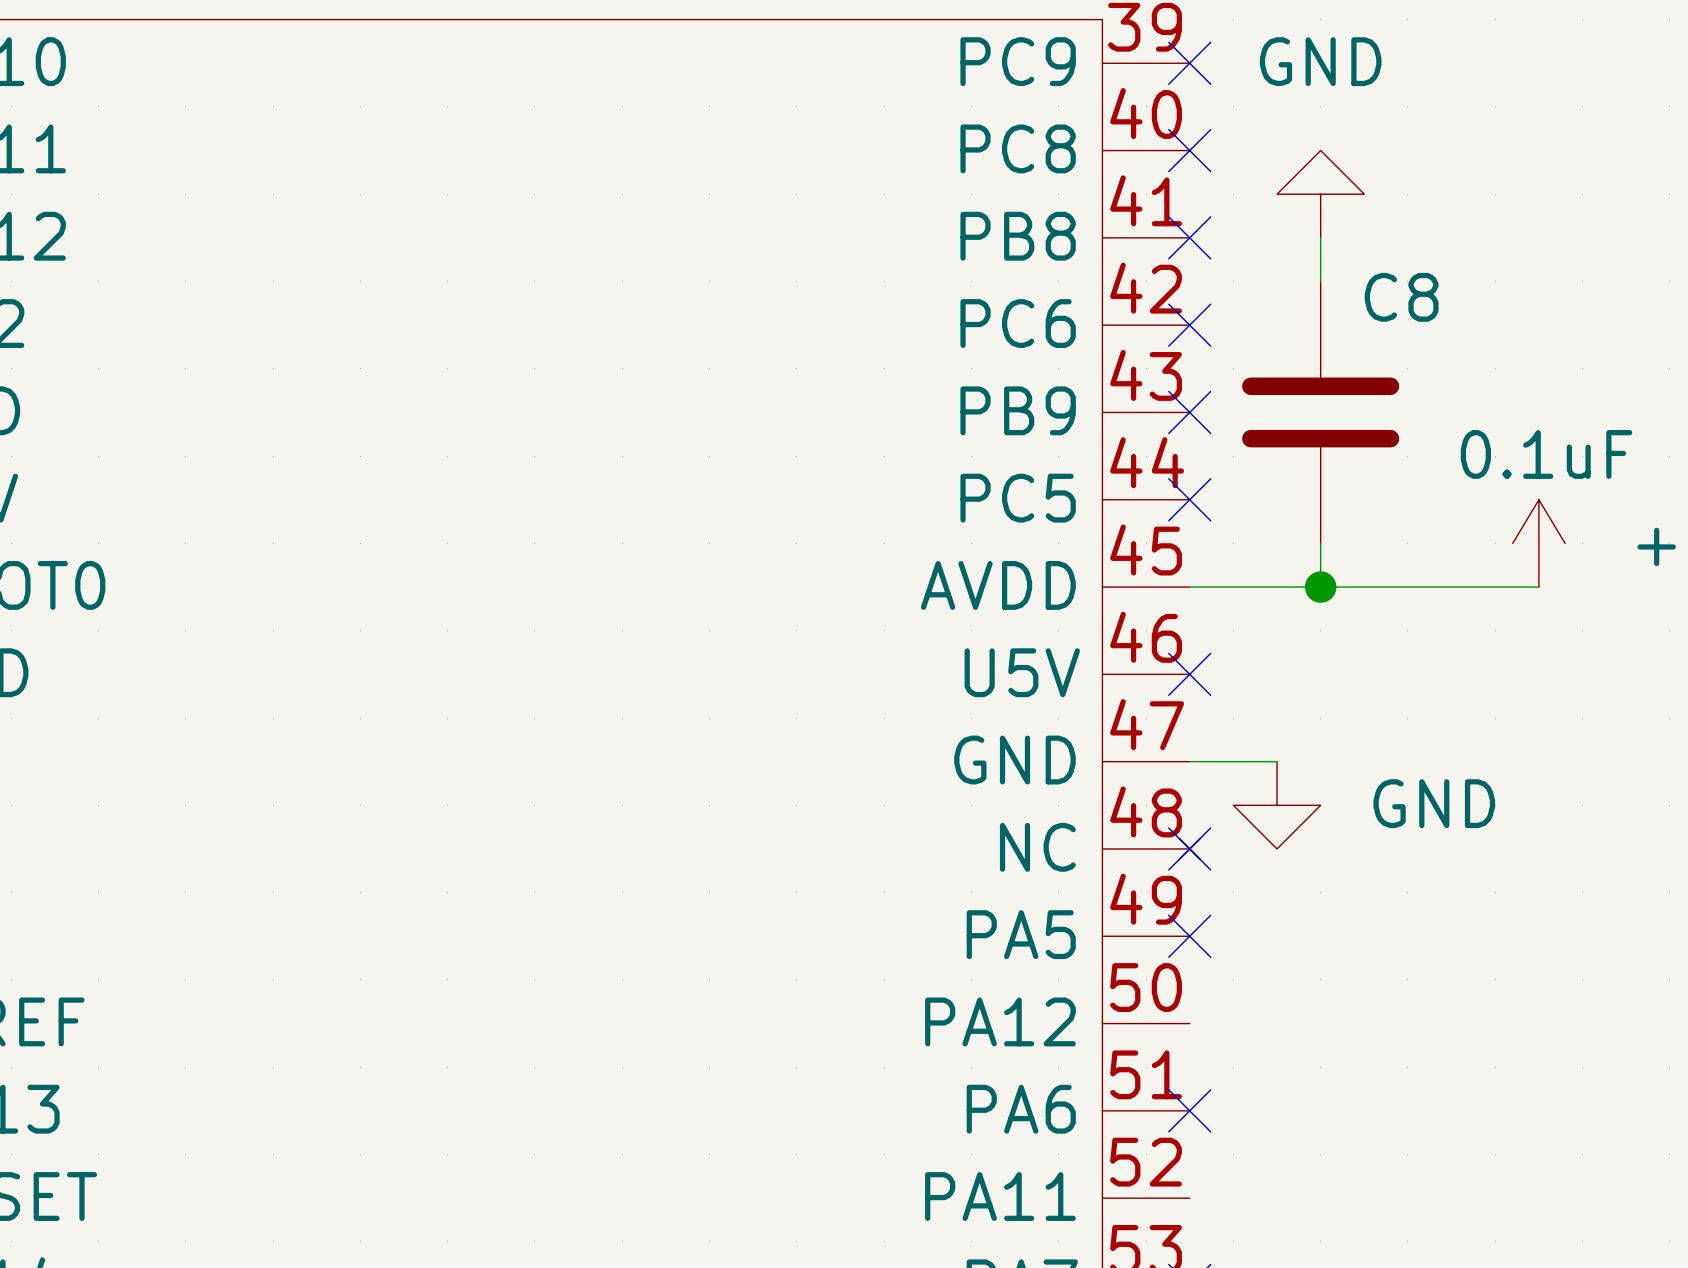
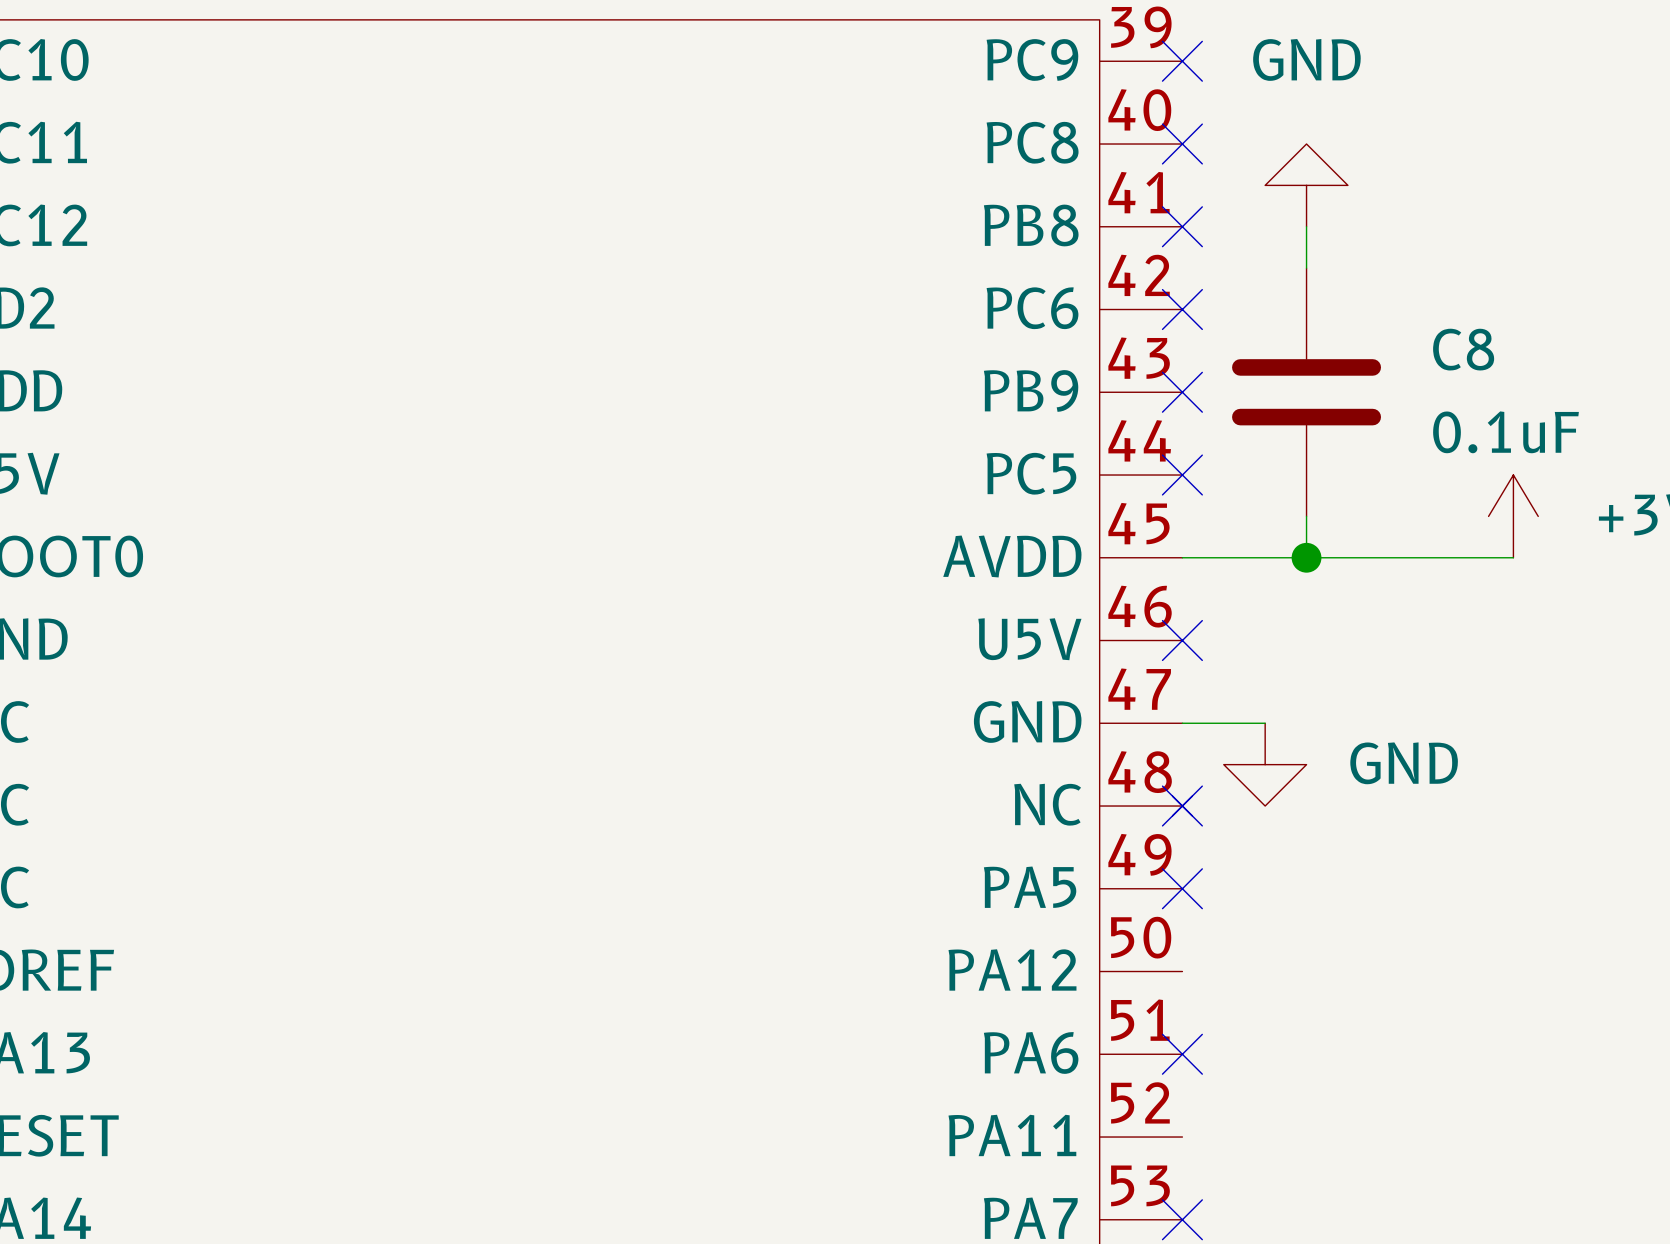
C8 name position: C8 (1401, 297) -> C8 (1463, 349)

